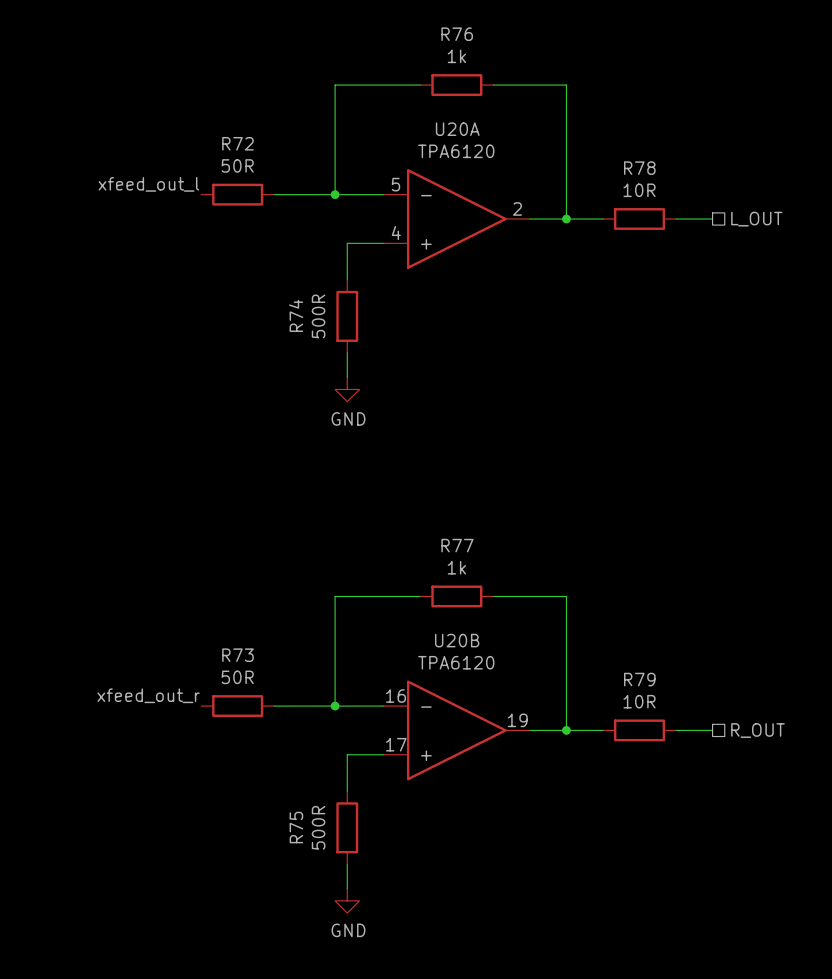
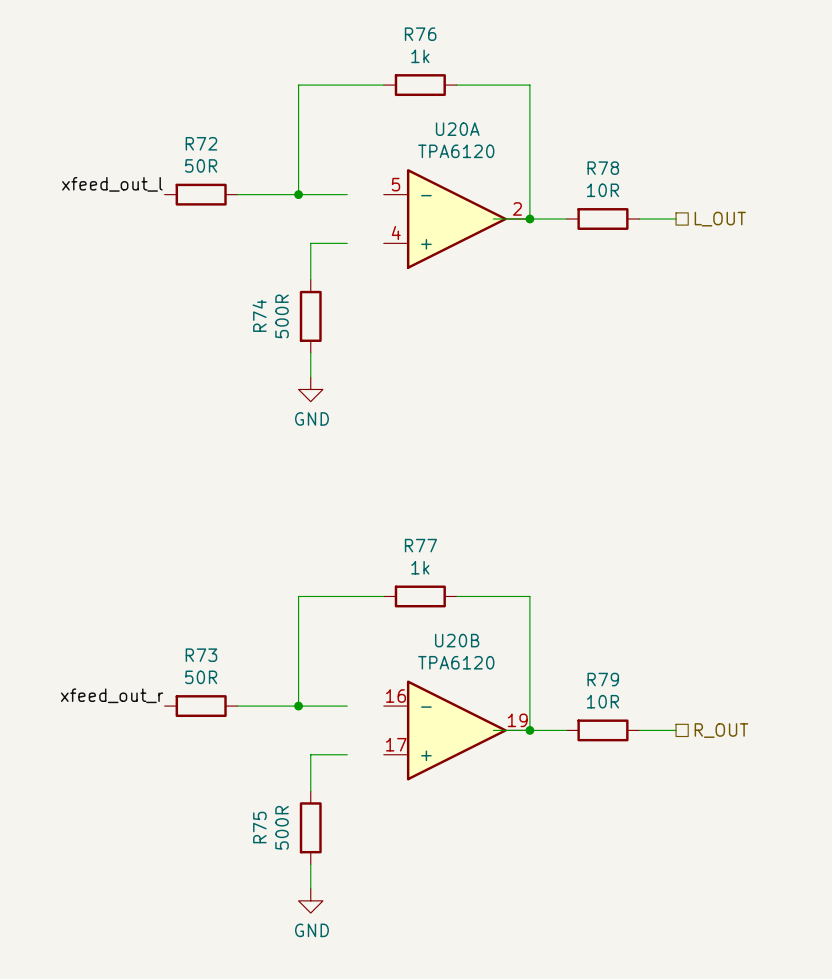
wire: (335, 85) (335, 194) -> (335, 85) (298, 85) (298, 194)
wire: (383, 85) (420, 85) -> (456, 85) (493, 85)
R76 position: (456, 85) -> (420, 85)
wire: (529, 85) (566, 85) (566, 219) (602, 219) -> (529, 85) (529, 219) (493, 219)
label position: xfeed_out_l (148, 184) -> xfeed_out_l (112, 184)
R72 position: (237, 194) -> (201, 194)
junction position: (335, 194) -> (298, 194)
wire: (347, 194) (383, 194) -> (237, 194) (274, 194)
junction position: (566, 219) -> (529, 219)
R78 position: (639, 219) -> (602, 219)
wire: (676, 219) (712, 219) -> (676, 219) (639, 219)
hierarchical label position: L_OUT (756, 219) -> L_OUT (720, 219)
wire: (383, 243) (347, 243) (347, 279) -> (347, 243) (310, 243) (310, 279)
R74 position: (347, 316) -> (310, 316)
wire: (347, 352) (347, 377) -> (310, 352) (310, 377)
power symbol position: GND (347, 389) -> GND (310, 389)
wire: (335, 596) (335, 706) -> (335, 596) (298, 596) (298, 706)
wire: (383, 596) (420, 596) -> (456, 596) (493, 596)
R77 position: (456, 596) -> (420, 596)
wire: (529, 596) (566, 596) (566, 730) (602, 730) -> (529, 596) (529, 730) (493, 730)
label position: xfeed_out_r (148, 695) -> xfeed_out_r (112, 695)
R73 position: (237, 706) -> (201, 706)
junction position: (335, 706) -> (298, 706)
wire: (347, 706) (383, 706) -> (237, 706) (274, 706)
junction position: (566, 730) -> (529, 730)
R79 position: (639, 730) -> (602, 730)
wire: (676, 730) (712, 730) -> (676, 730) (639, 730)
hierarchical label position: R_OUT (757, 730) -> R_OUT (721, 730)
wire: (383, 754) (347, 754) (347, 791) -> (347, 754) (310, 754) (310, 791)
R75 position: (347, 827) -> (310, 827)
wire: (347, 864) (347, 888) -> (310, 864) (310, 888)
power symbol position: GND (347, 900) -> GND (310, 900)

